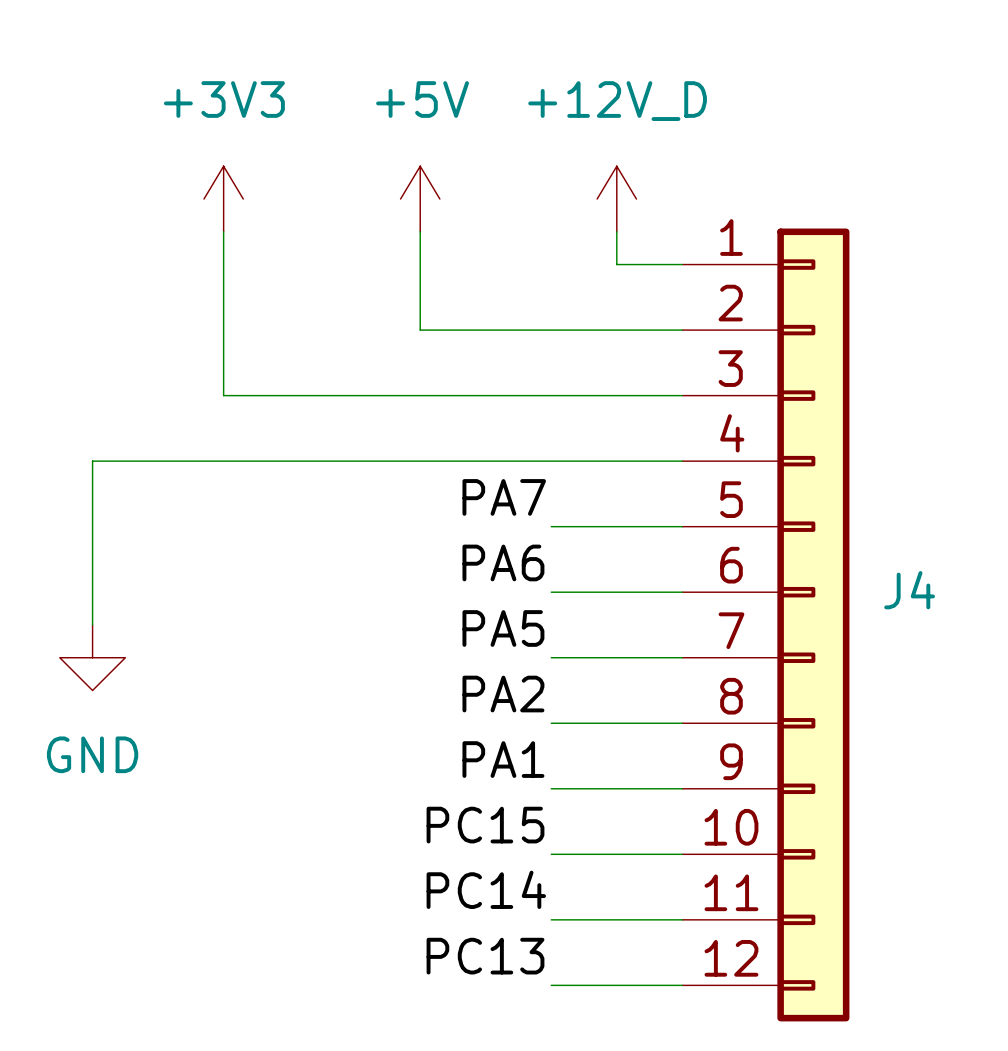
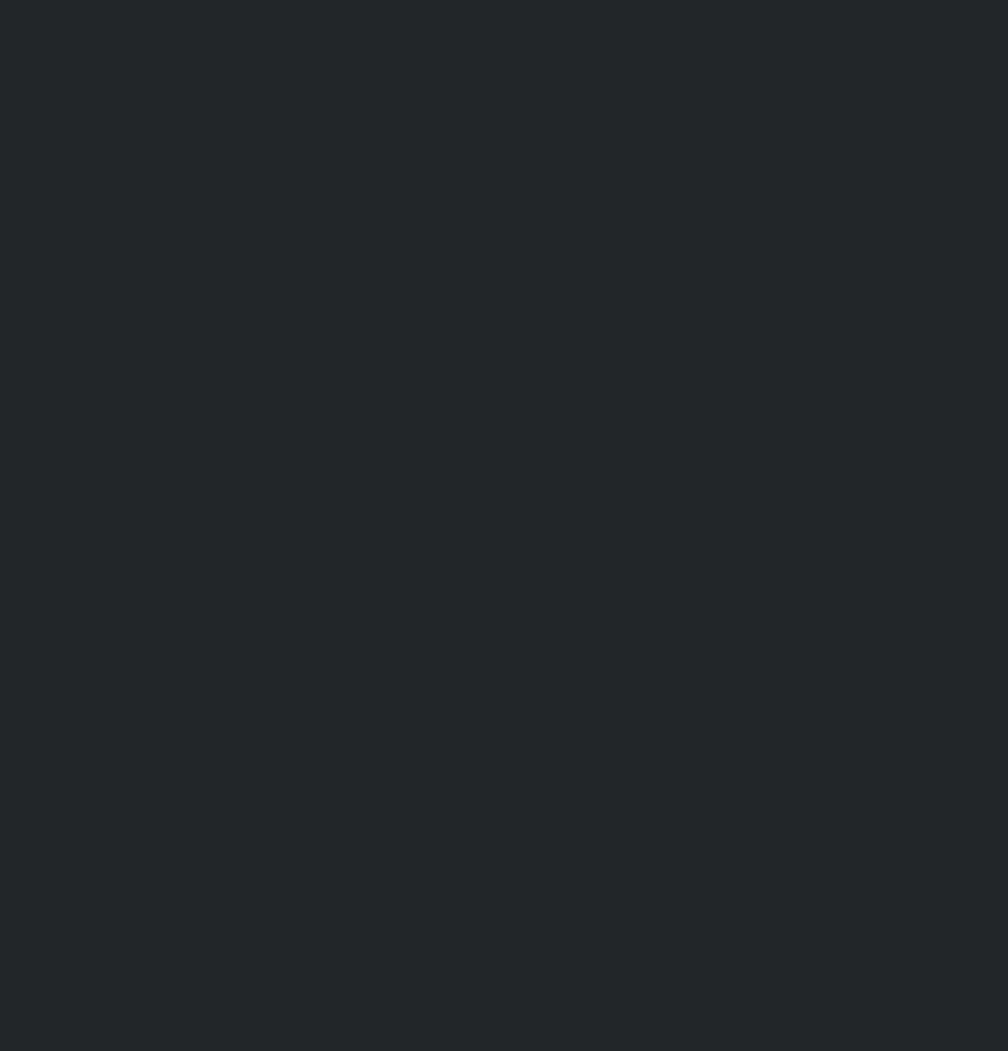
power symbol: +3V3 (223, 199) -> none
power symbol: +5V (420, 199) -> none
power symbol: +12V_D (616, 199) -> none
wire: (223, 231) (223, 395) (682, 395) -> none
wire: (420, 231) (420, 330) (682, 330) -> none
wire: (616, 231) (616, 264) (682, 264) -> none
wire: (682, 461) (92, 461) (92, 624) -> none
label: PA7 (504, 497) -> none
wire: (551, 526) (682, 526) -> none
label: PA6 (503, 562) -> none
wire: (551, 592) (682, 592) -> none
J4: (765, 624) -> none
label: PA5 (503, 628) -> none
power symbol: GND (92, 657) -> none
wire: (551, 657) (682, 657) -> none
label: PA2 (503, 694) -> none
wire: (551, 723) (682, 723) -> none
label: PA1 (503, 759) -> none
wire: (551, 788) (682, 788) -> none
label: PC15 (485, 825) -> none
wire: (551, 854) (682, 854) -> none
label: PC14 (486, 889) -> none
wire: (551, 919) (682, 919) -> none
label: PC13 (485, 956) -> none
wire: (551, 985) (682, 985) -> none

